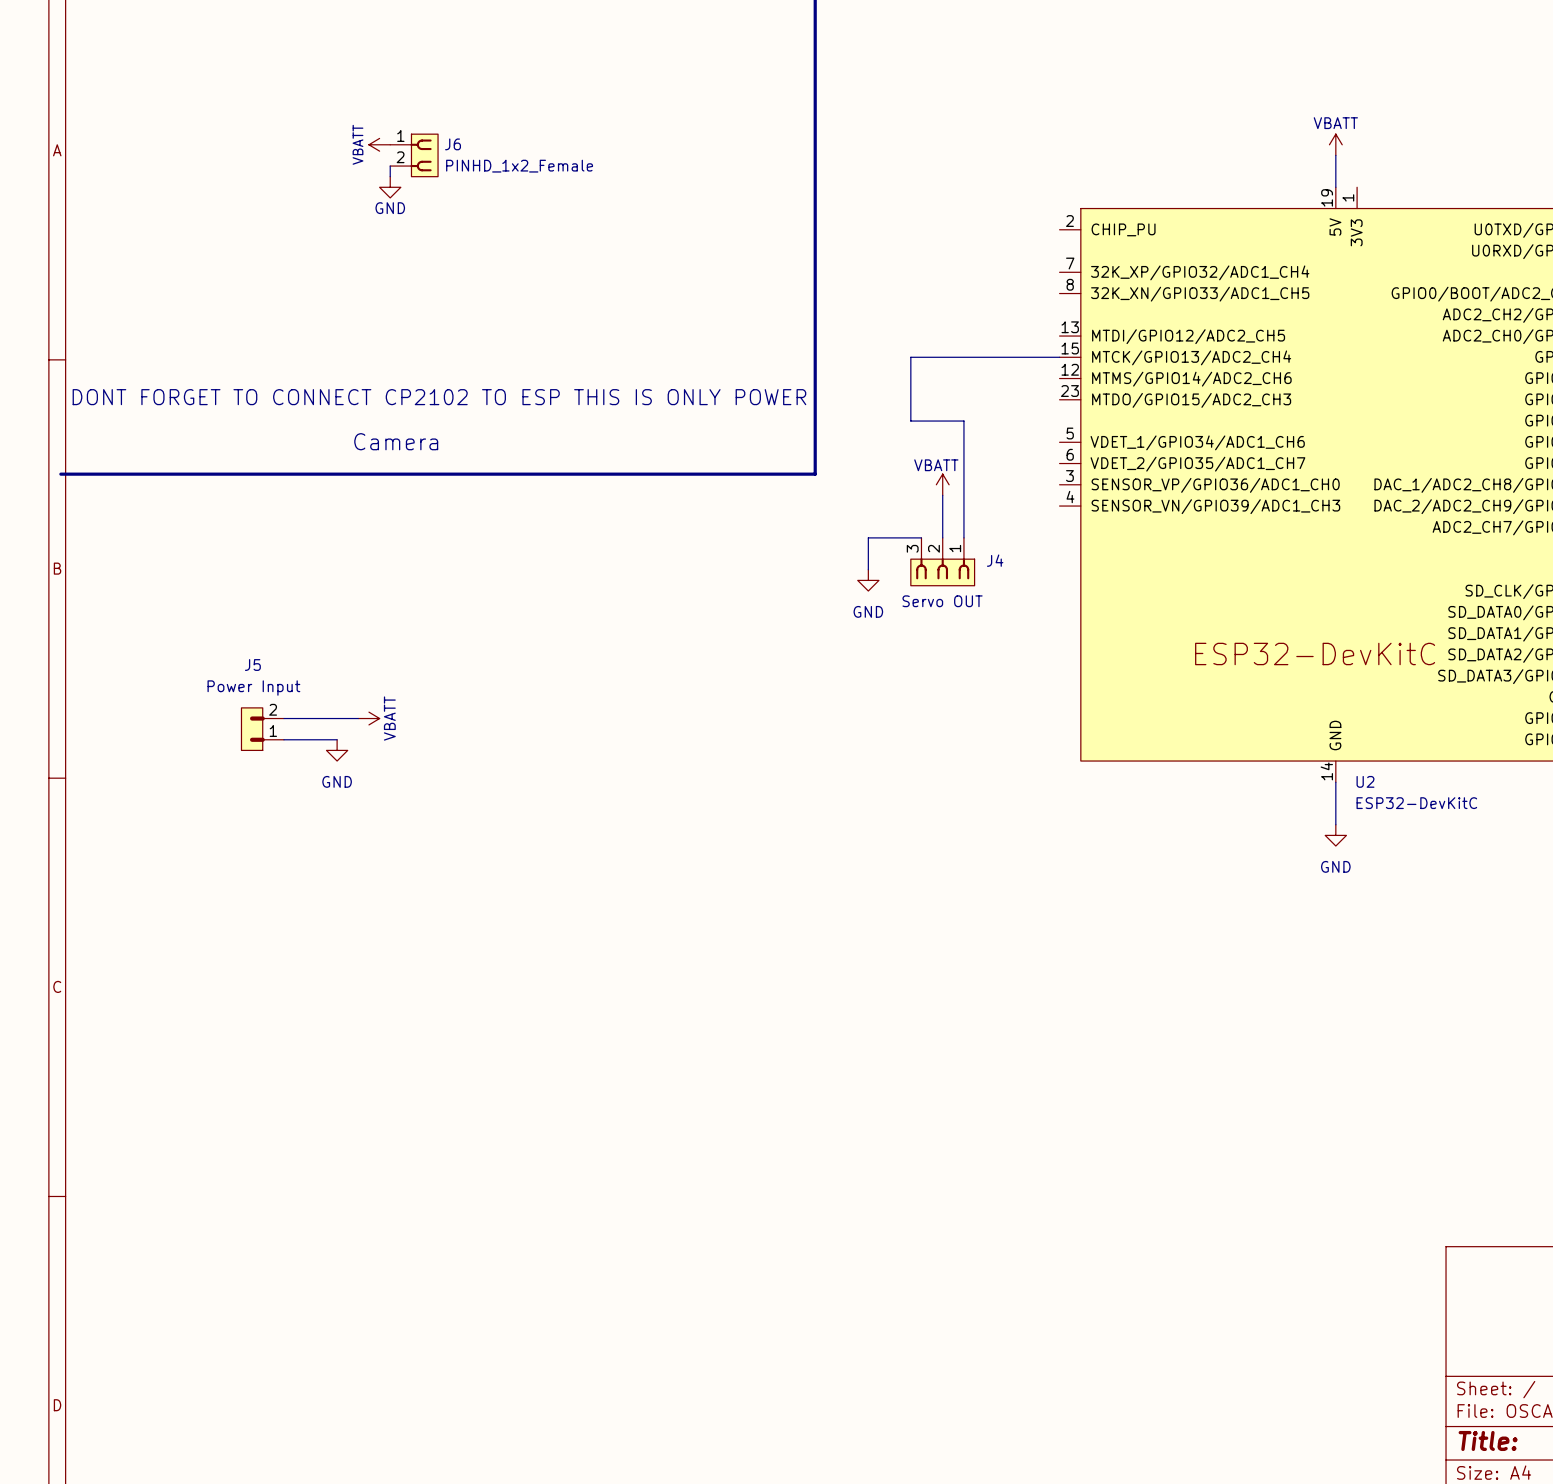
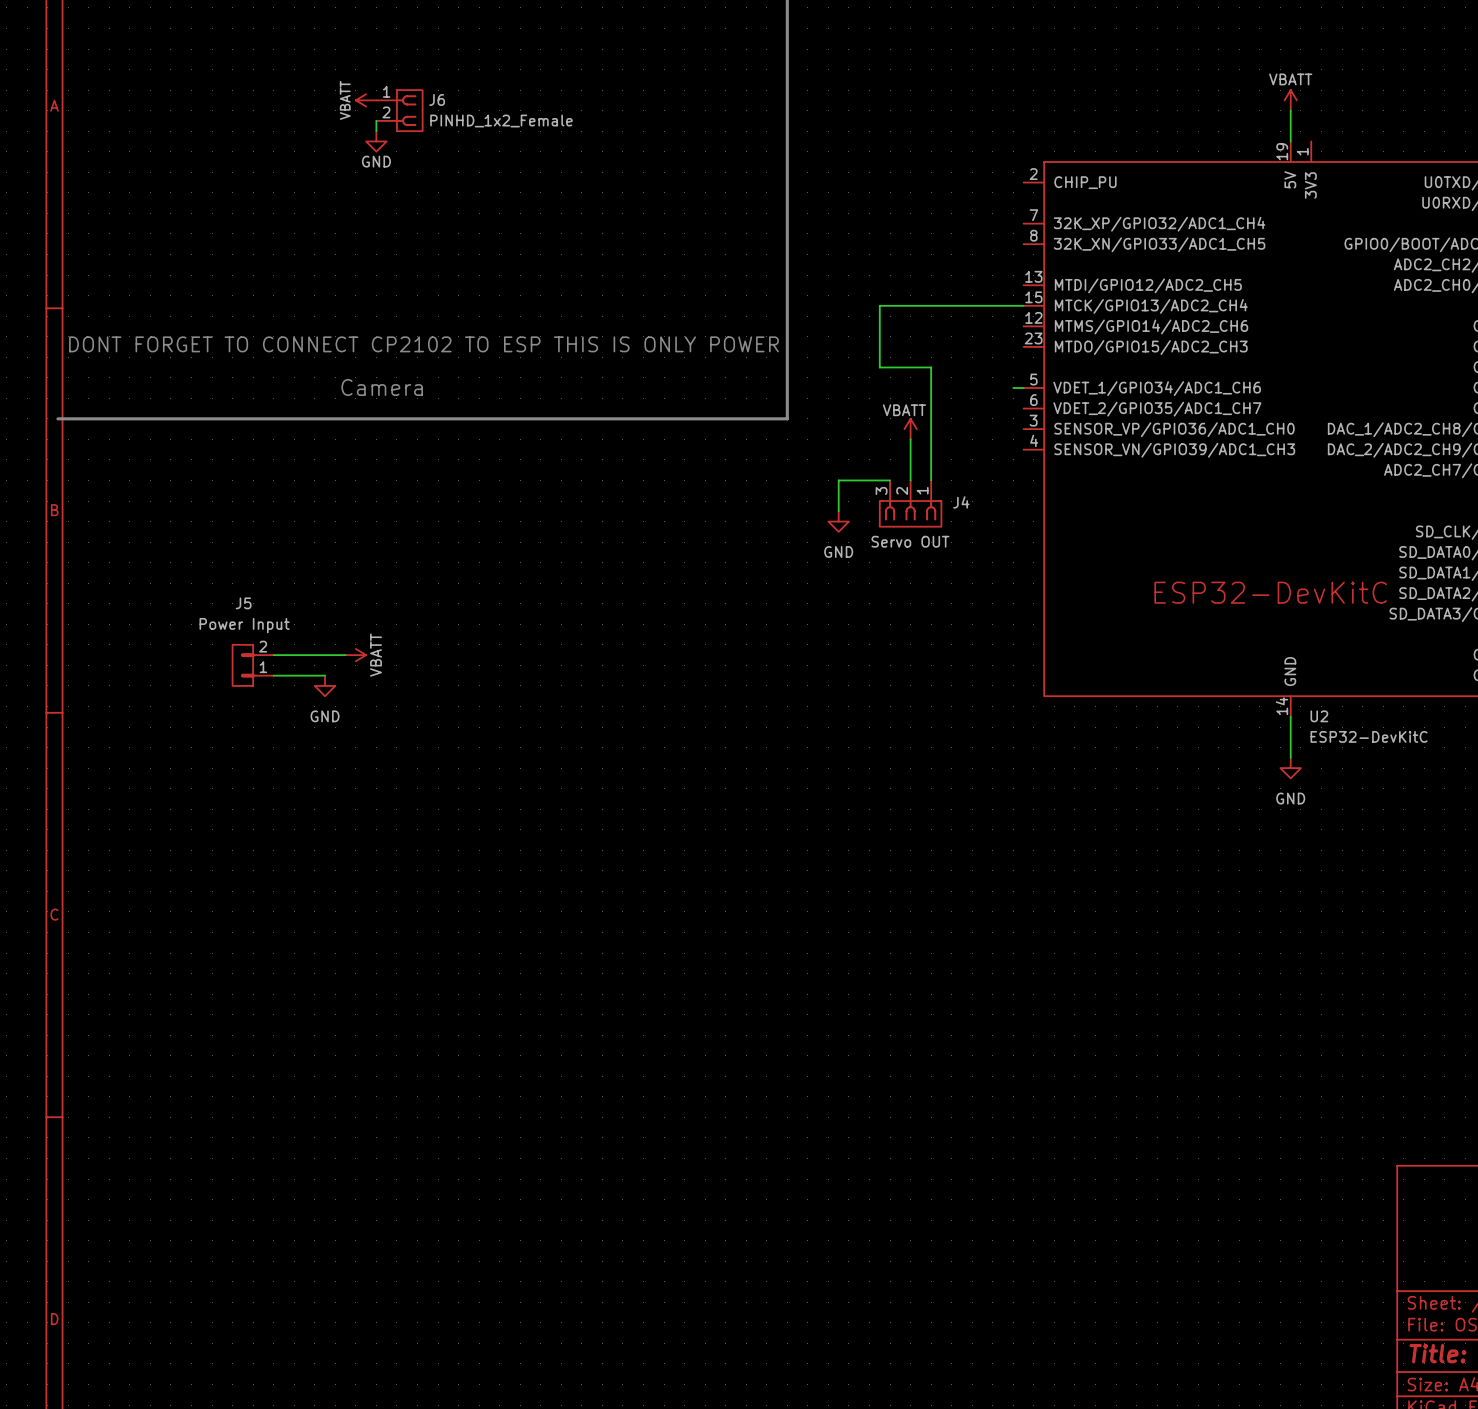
wire: none -> (1013, 388) (1023, 388)

